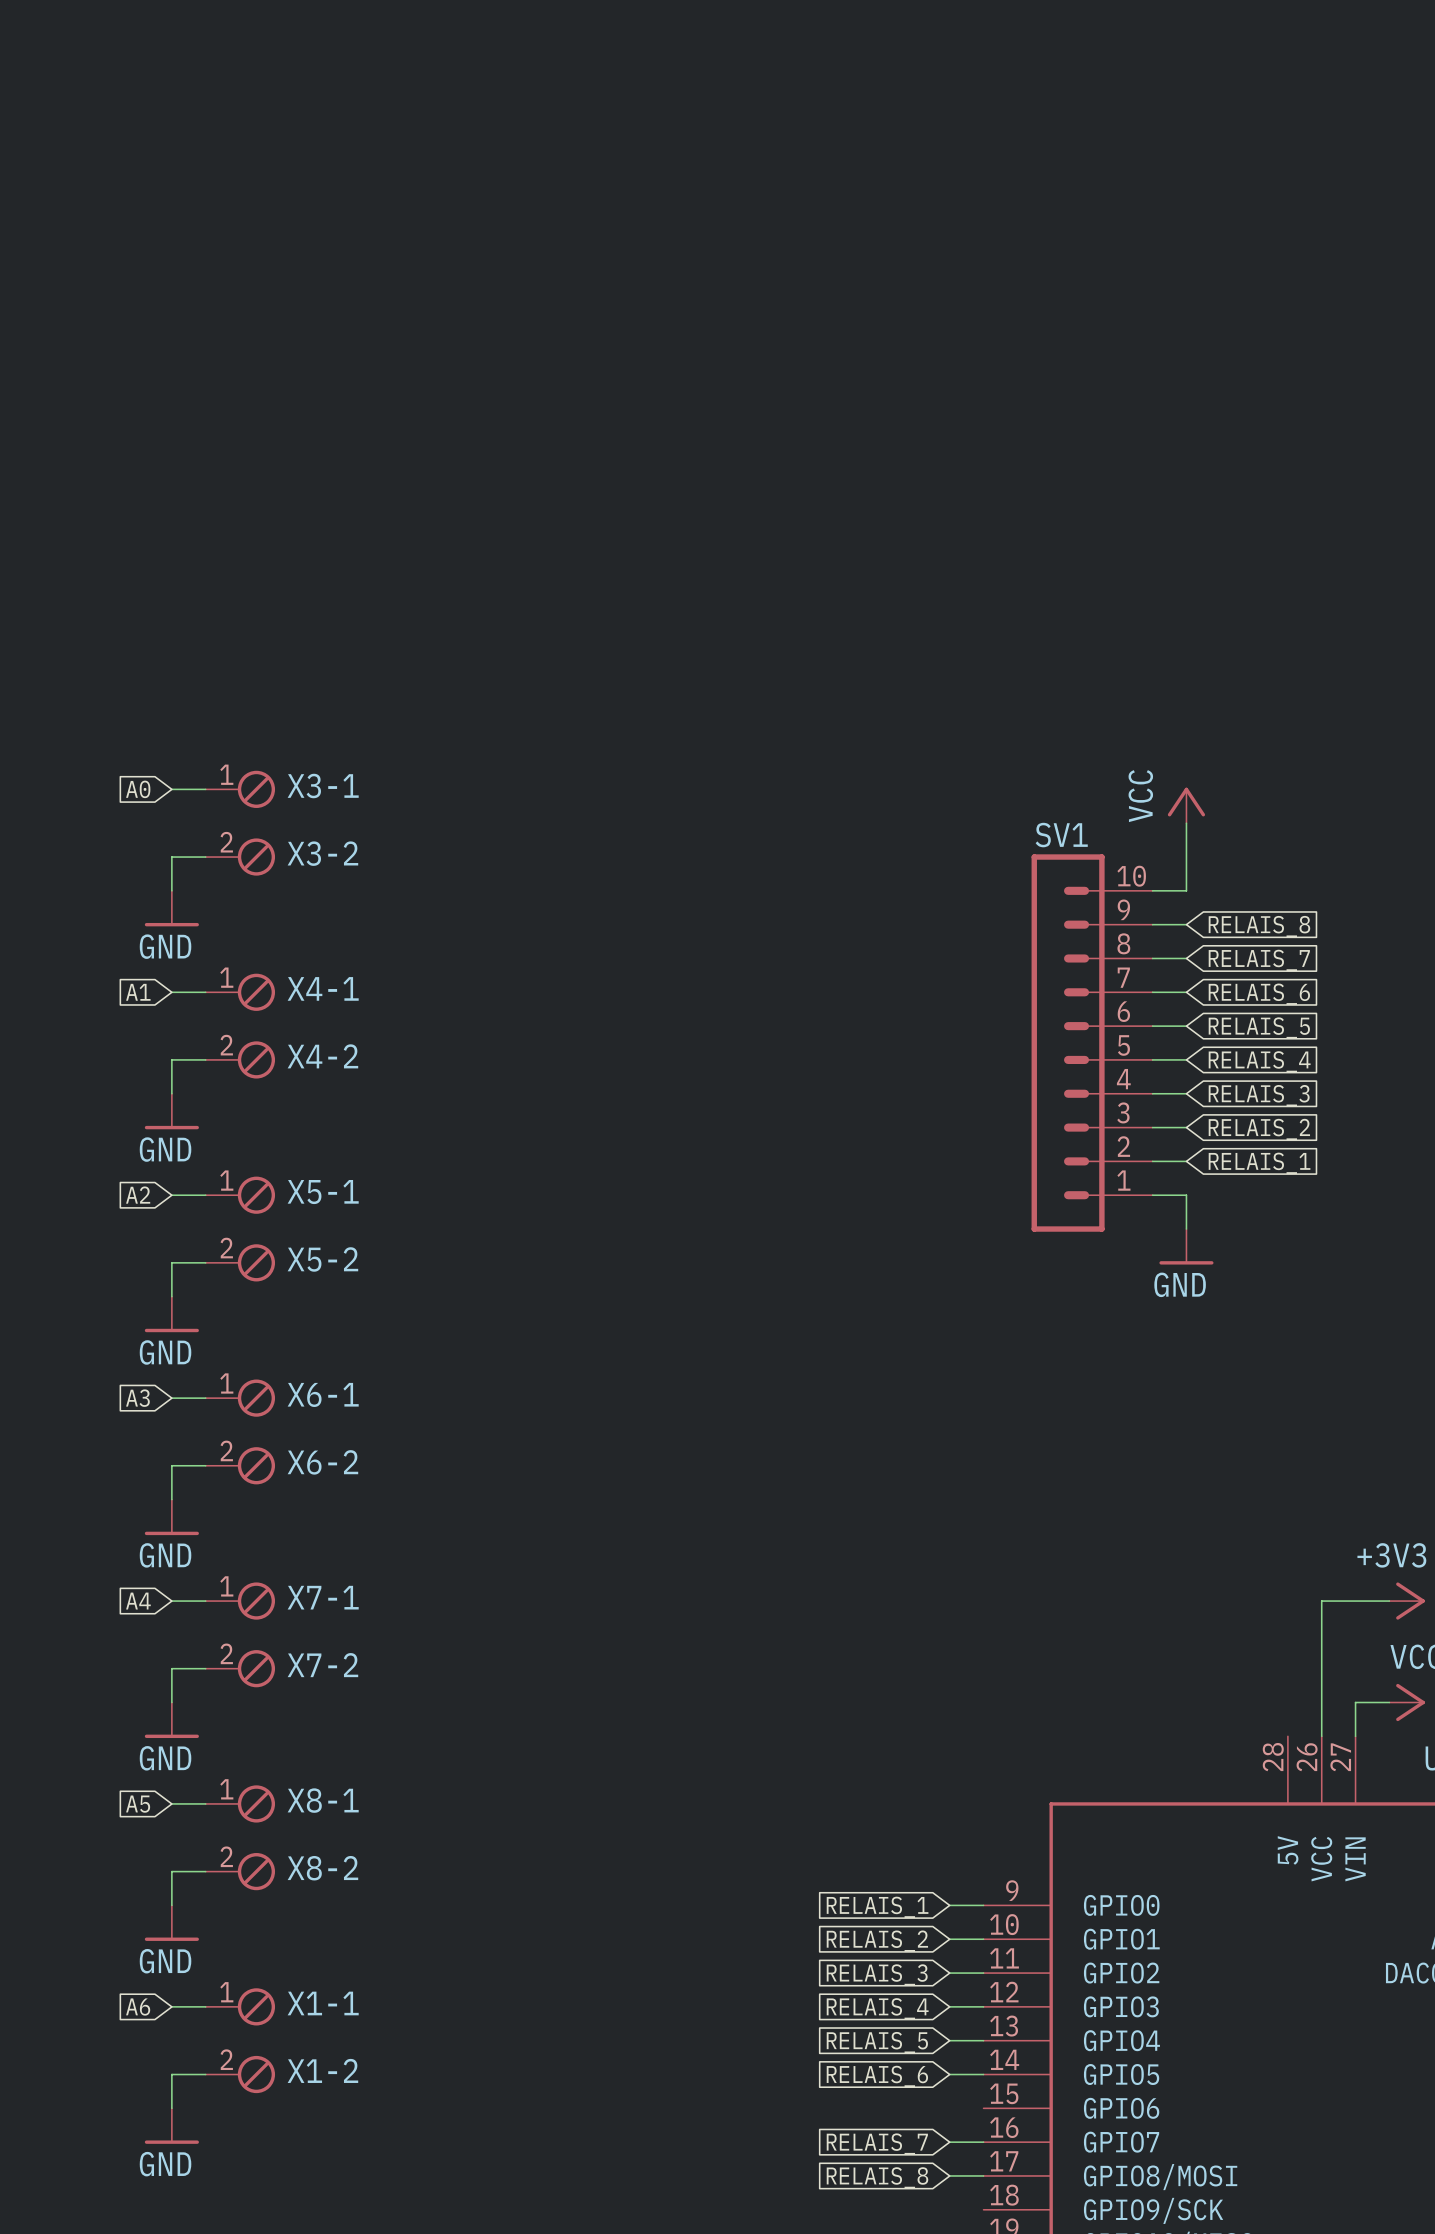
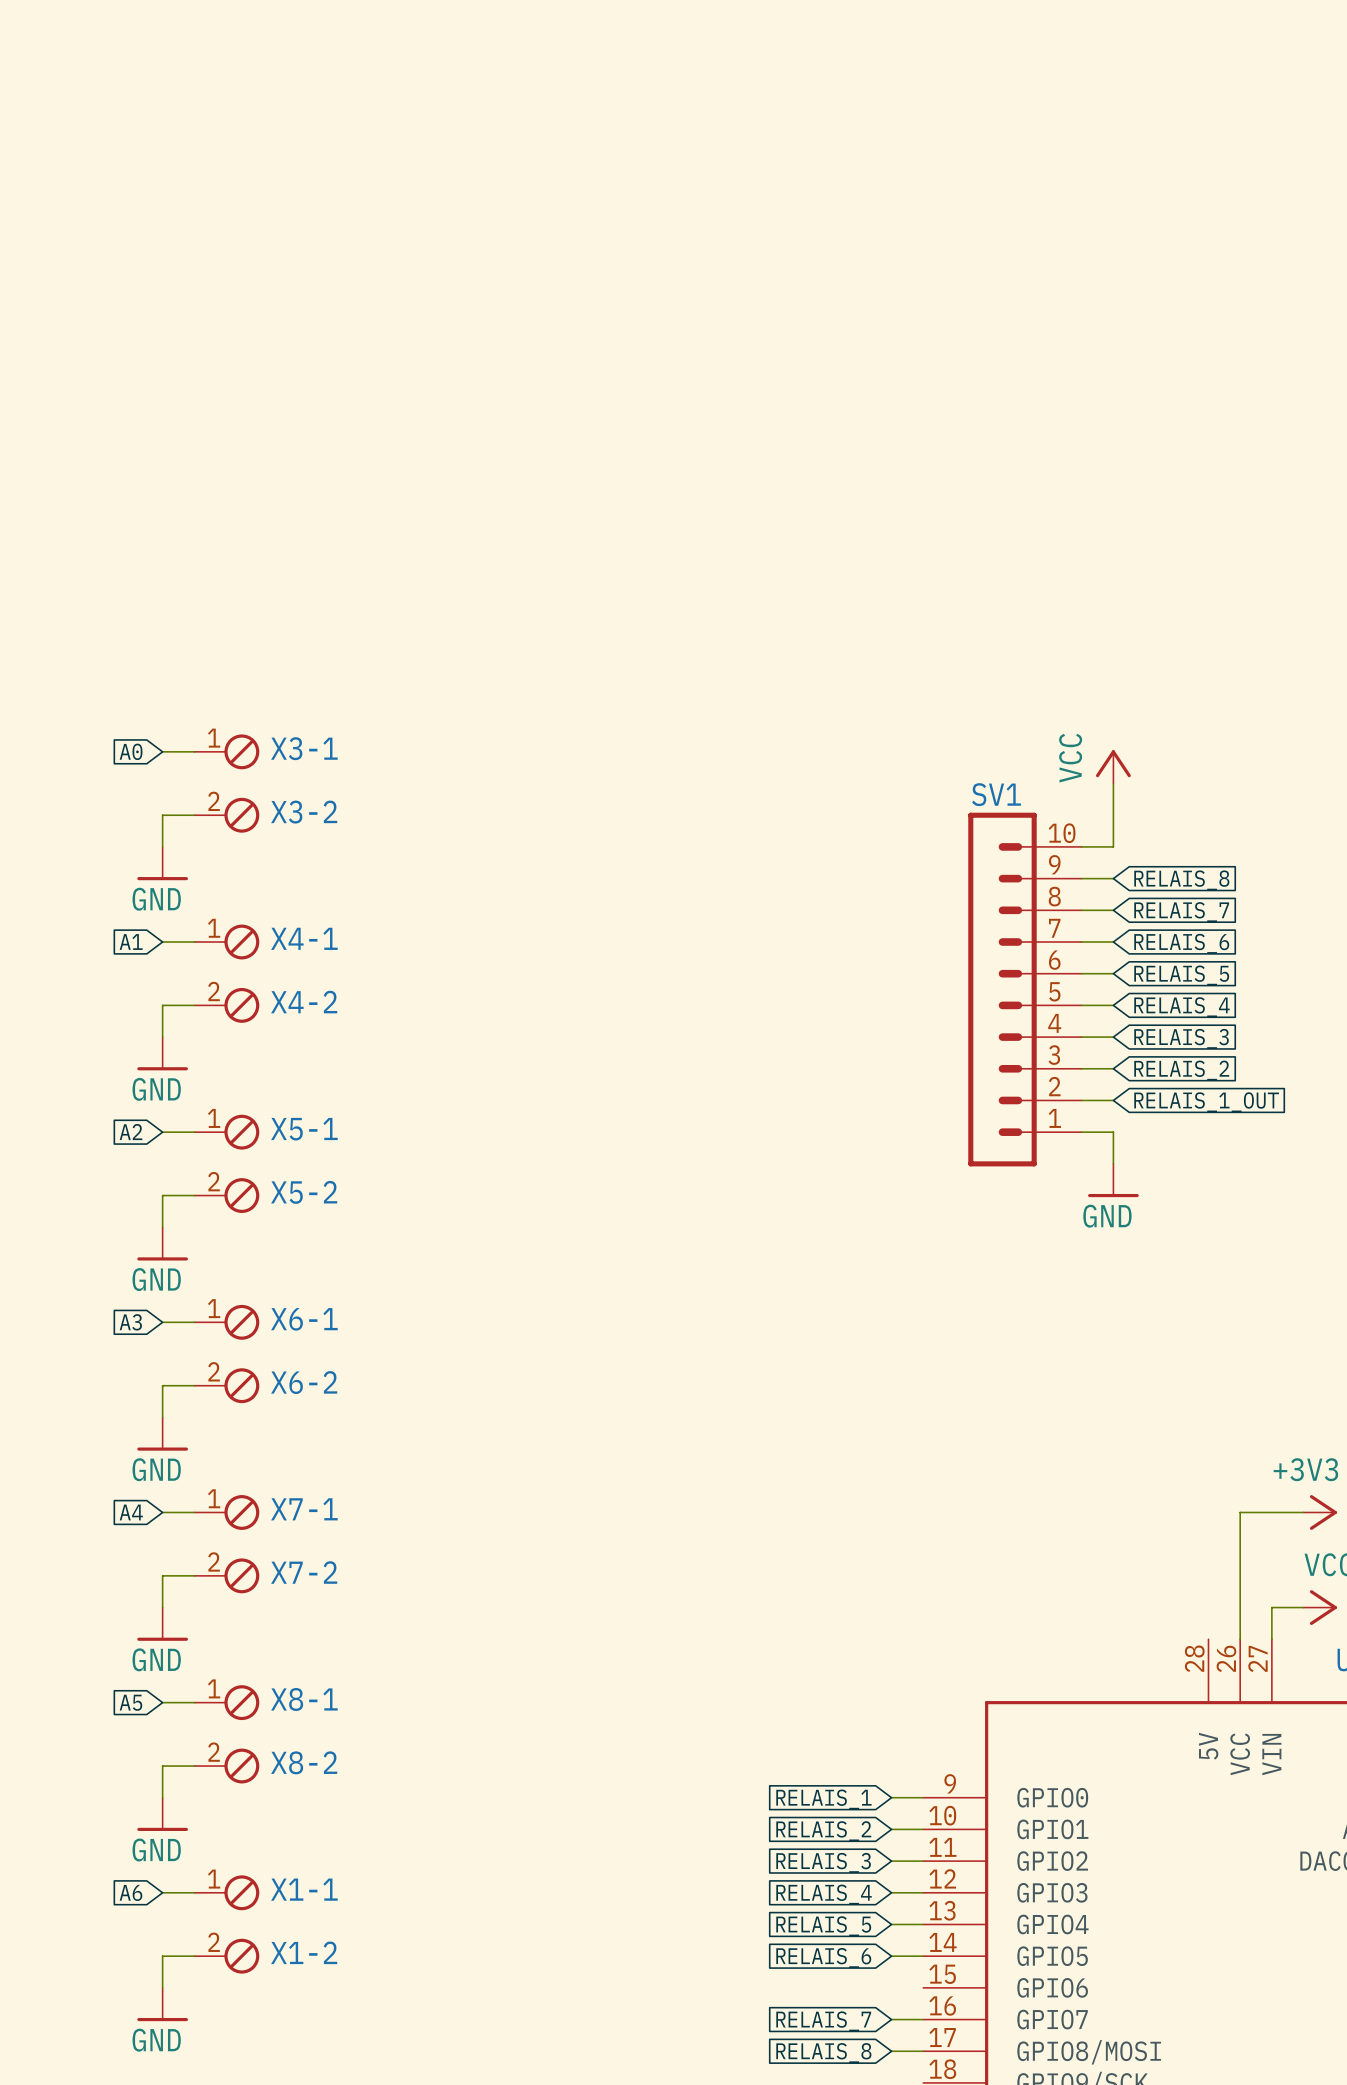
global label: RELAIS_1 (1259, 1163) -> RELAIS_1_OUT (1206, 1102)

